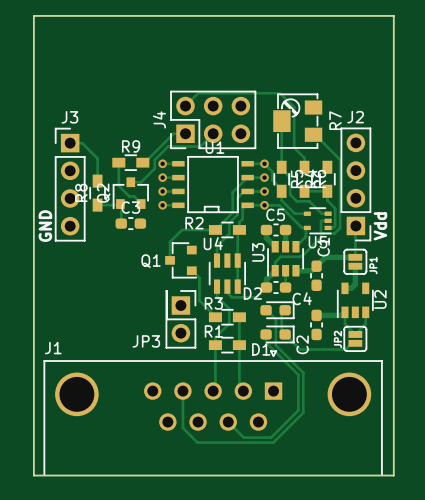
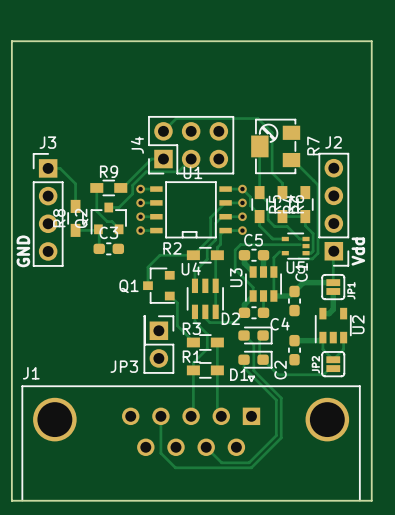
track: (264, 205) (279, 205) (302, 227) (307, 227) -> none
track: (328, 220) (321, 221) (321, 237) (301, 256) (280, 256) (275, 262) -> (300, 244) (240, 244) (235, 250) (235, 269) (253, 287)
track: none -> (279, 251) (273, 257) (273, 296)
track: (305, 227) (305, 236) (295, 246) -> none

